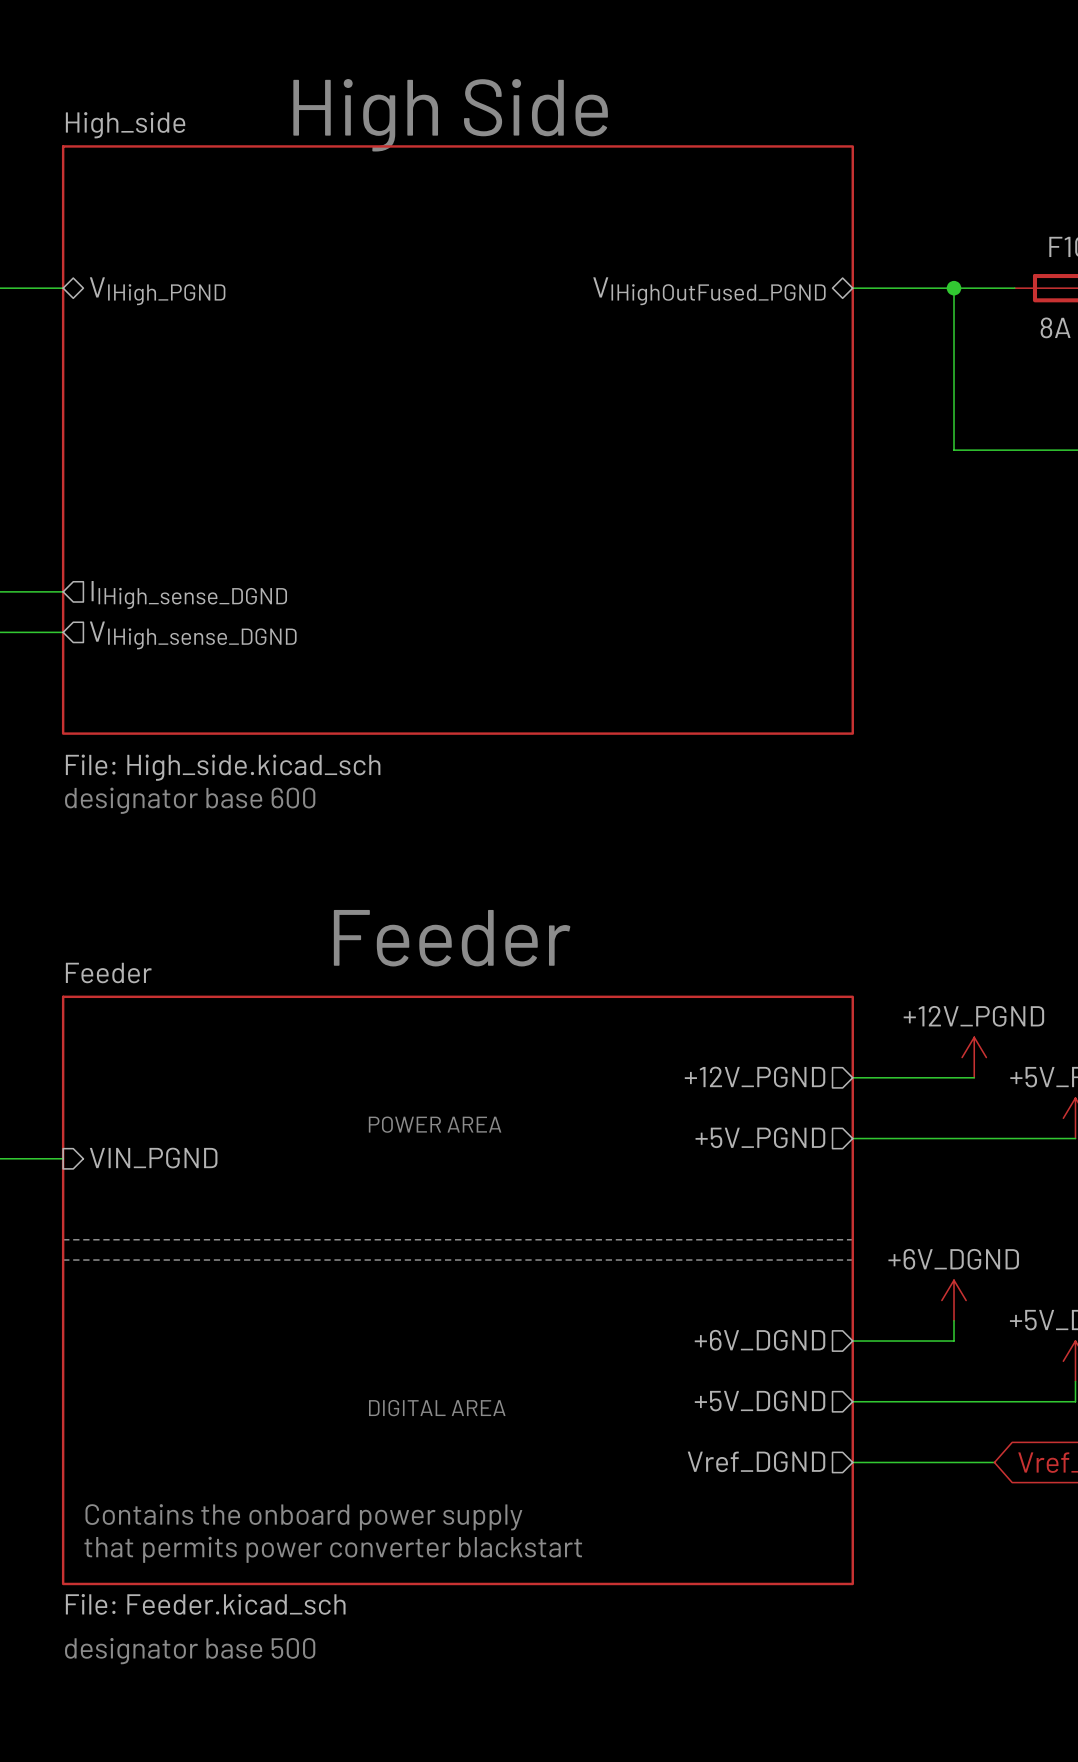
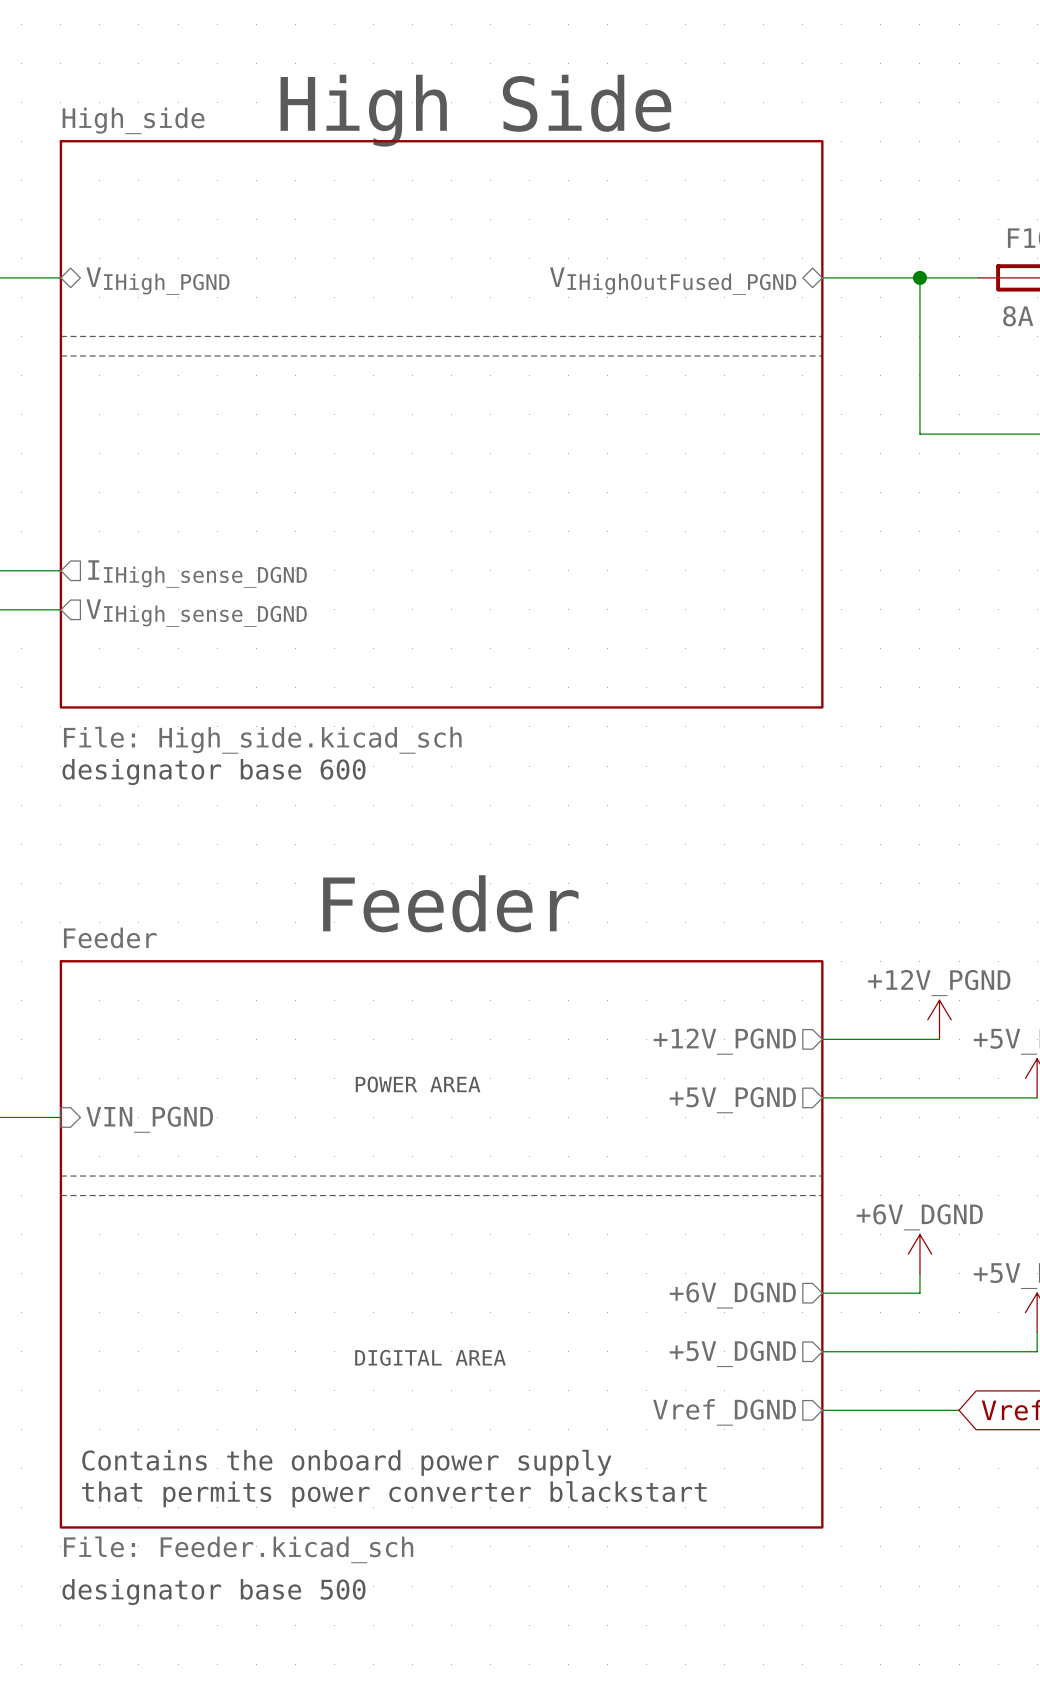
line: none -> (60, 336) (822, 336)
line: none -> (60, 355) (822, 355)
line: (63, 1260) (852, 1260) -> (60, 1176) (822, 1176)

